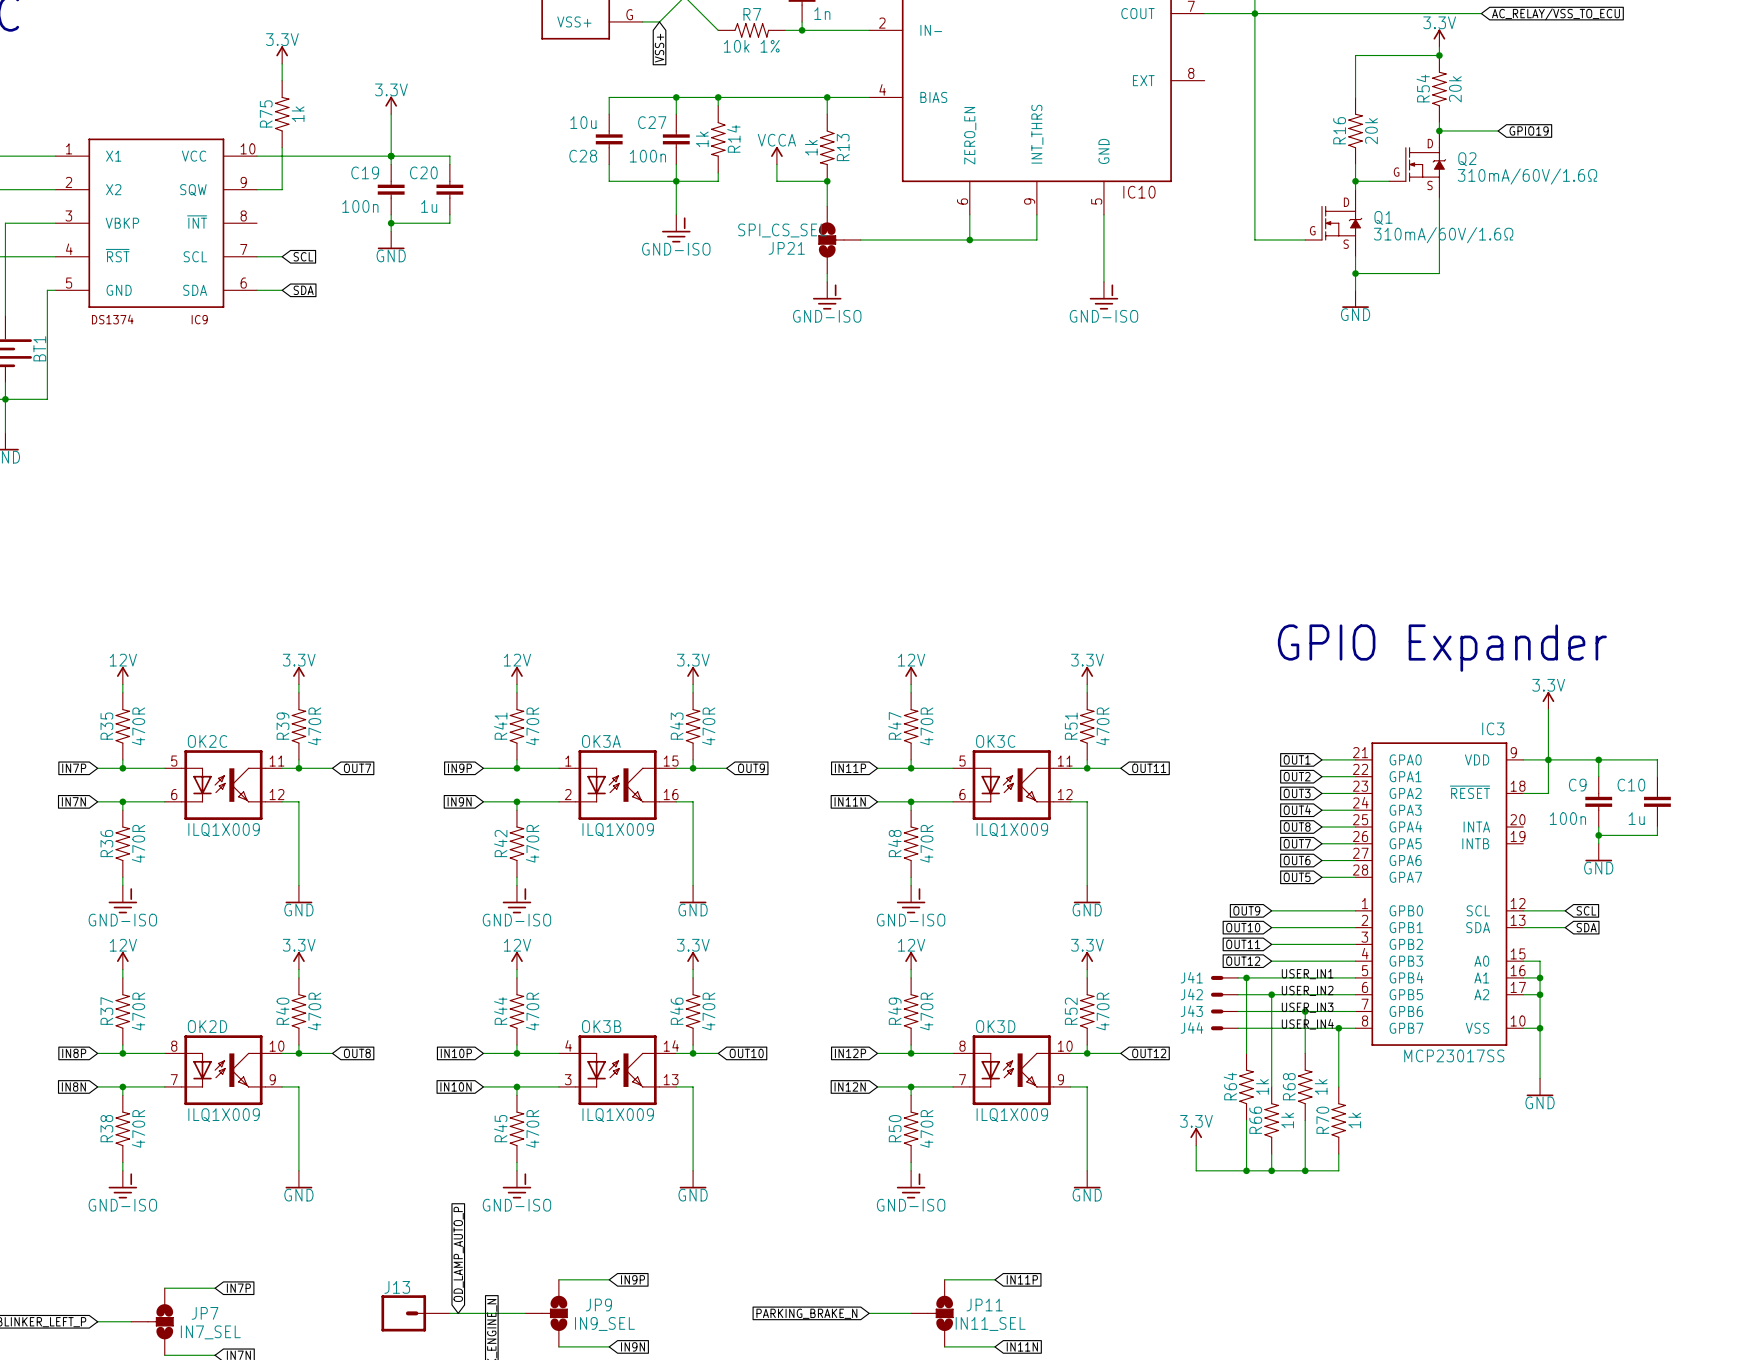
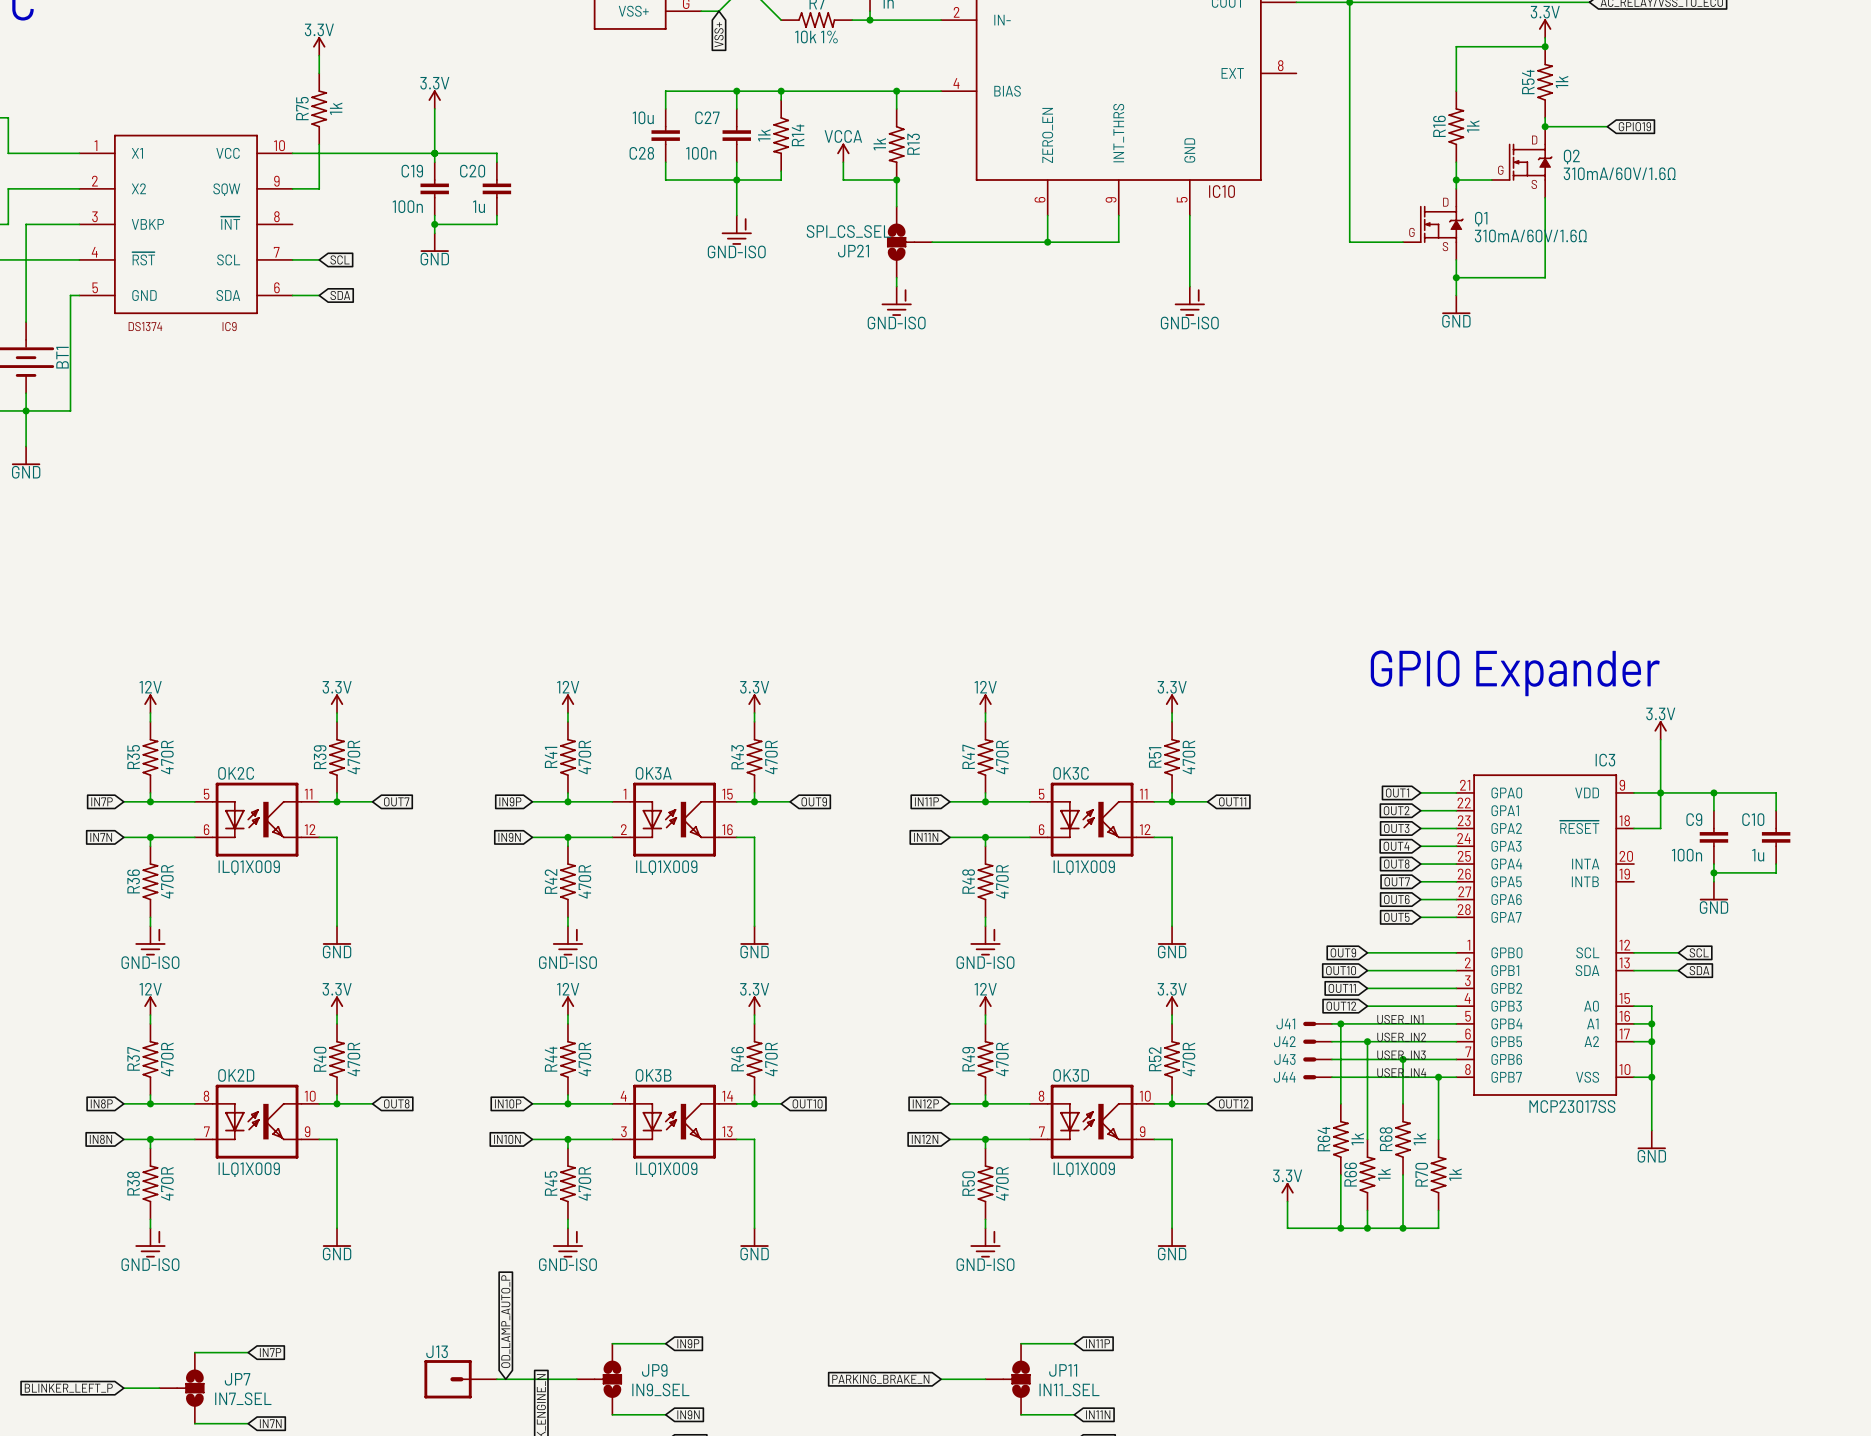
R54 value: 20k (1455, 89) -> 1k (1562, 82)
R16 value: 20k (1371, 131) -> 1k (1473, 126)

